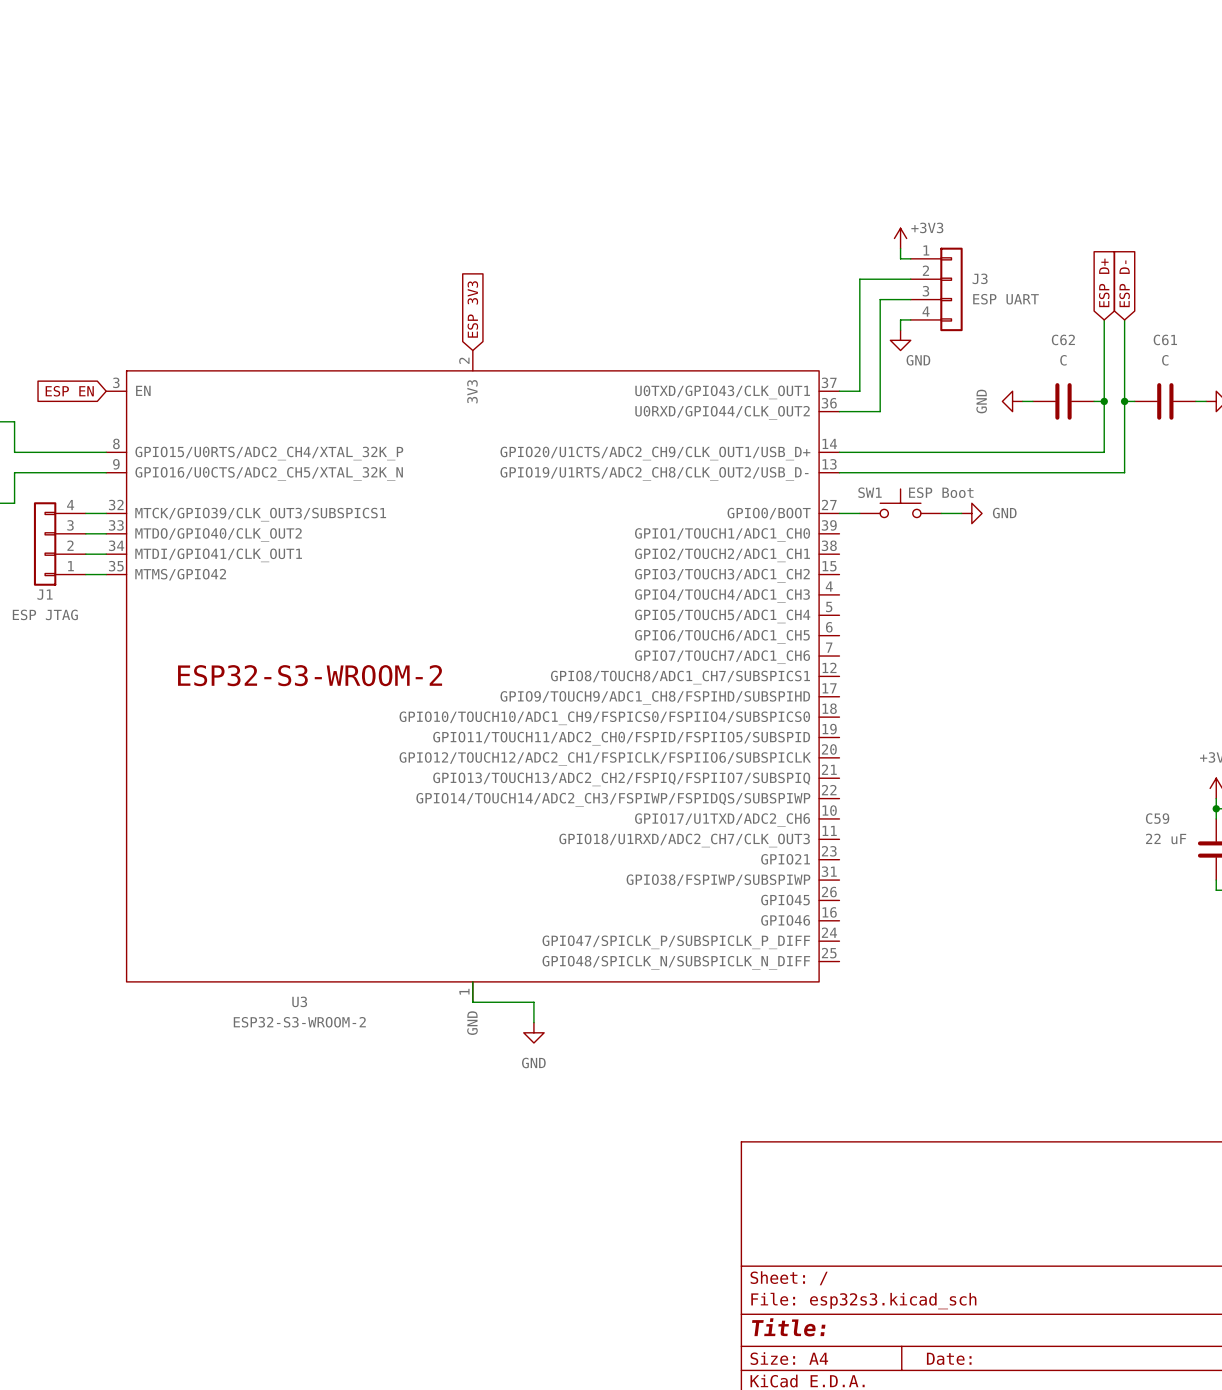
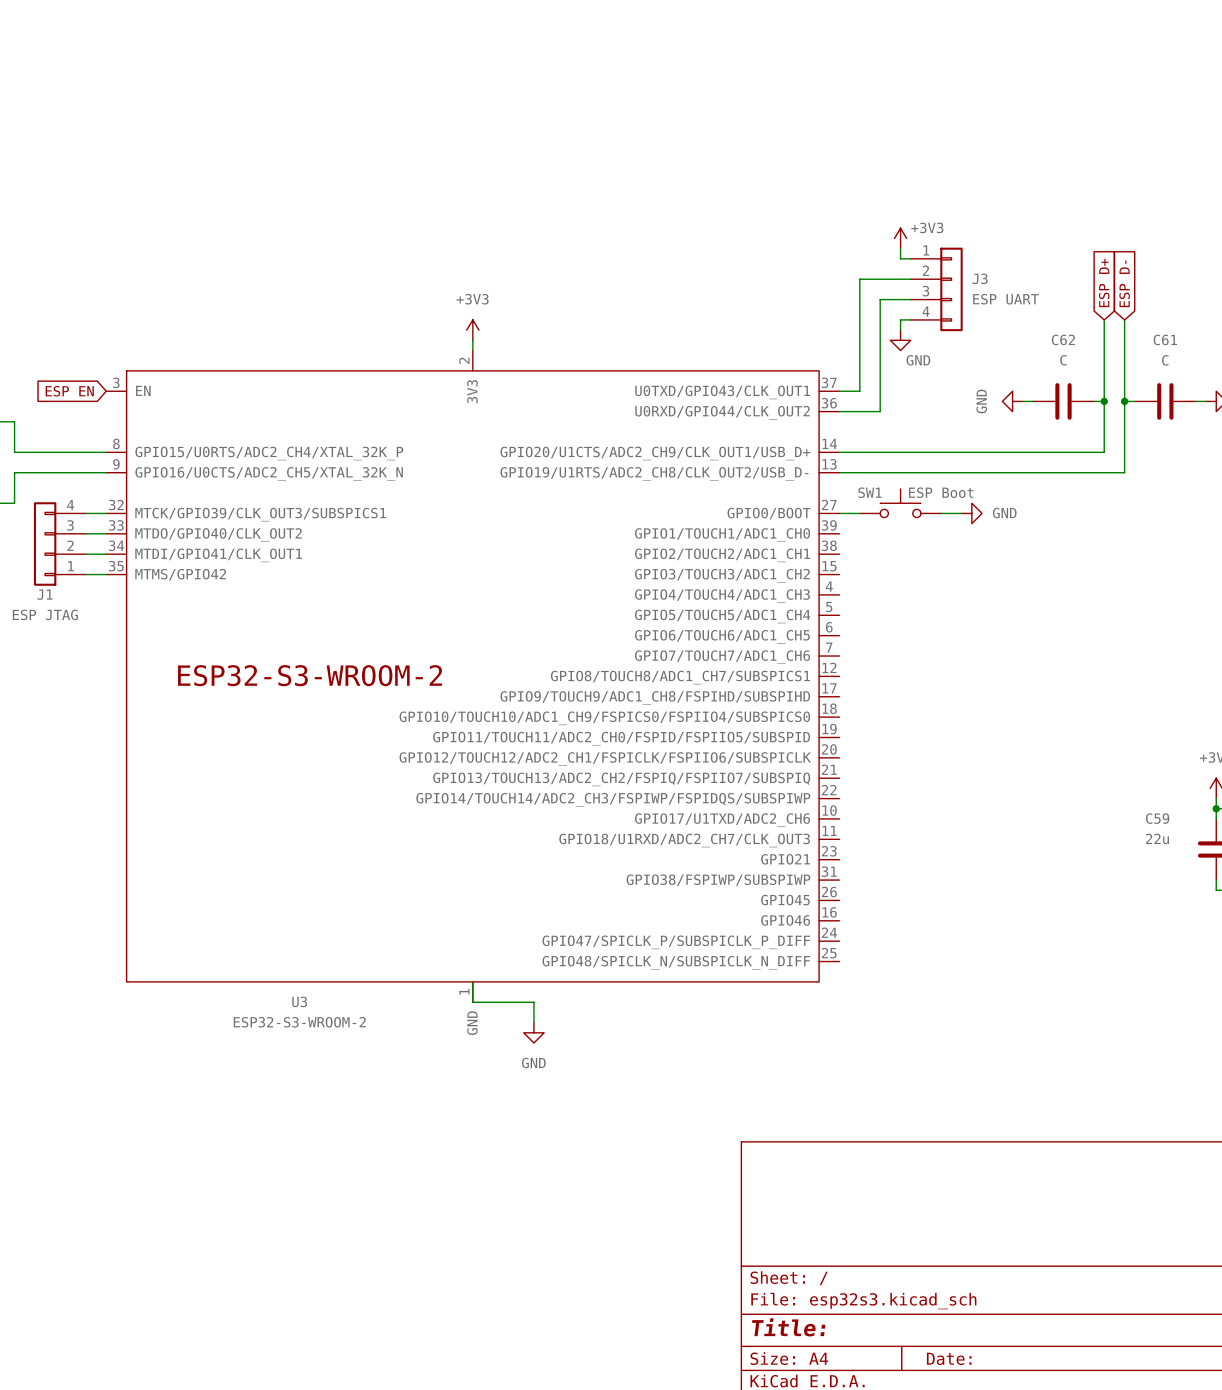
global label: ESP 3V3 (472, 309) -> none
power symbol: none -> +3V3 (472, 330)
wire: none -> (472, 340) (472, 350)
C59 value: 22 uF (1166, 838) -> 22u (1157, 838)

